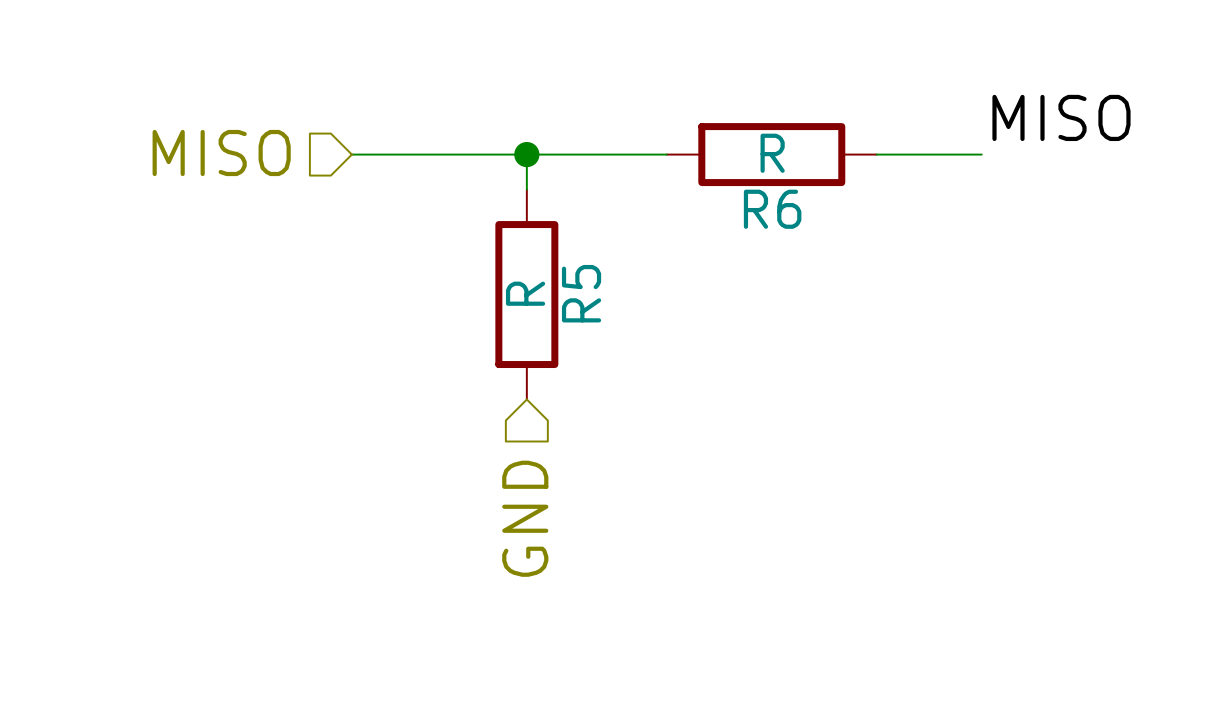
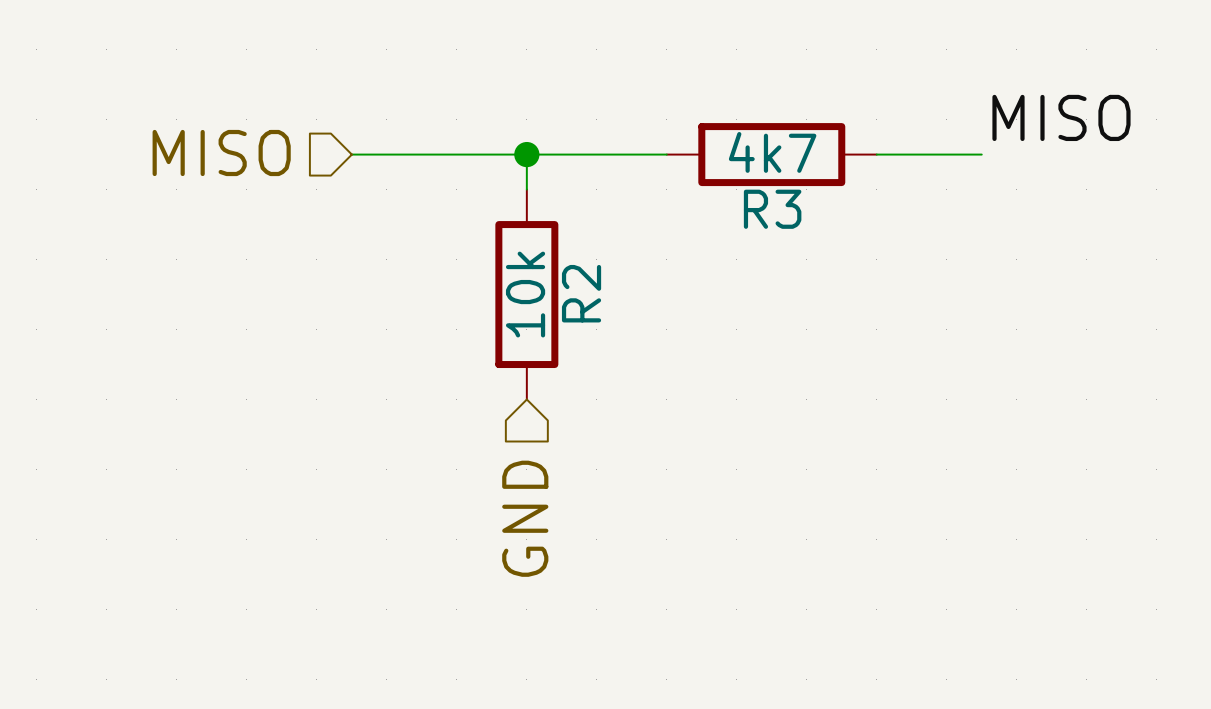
R6 value: R (772, 153) -> 4k7 (772, 152)
R6 name: R6 (772, 209) -> R3 (772, 209)
R5 value: R (525, 293) -> 10k (525, 294)
R5 name: R5 (581, 293) -> R2 (581, 293)

